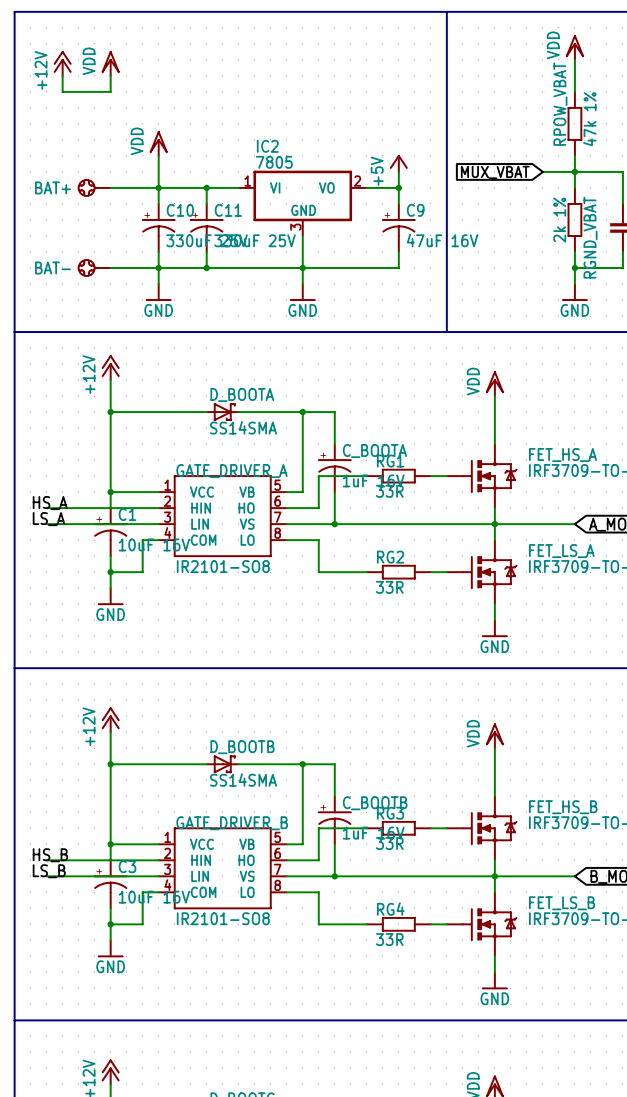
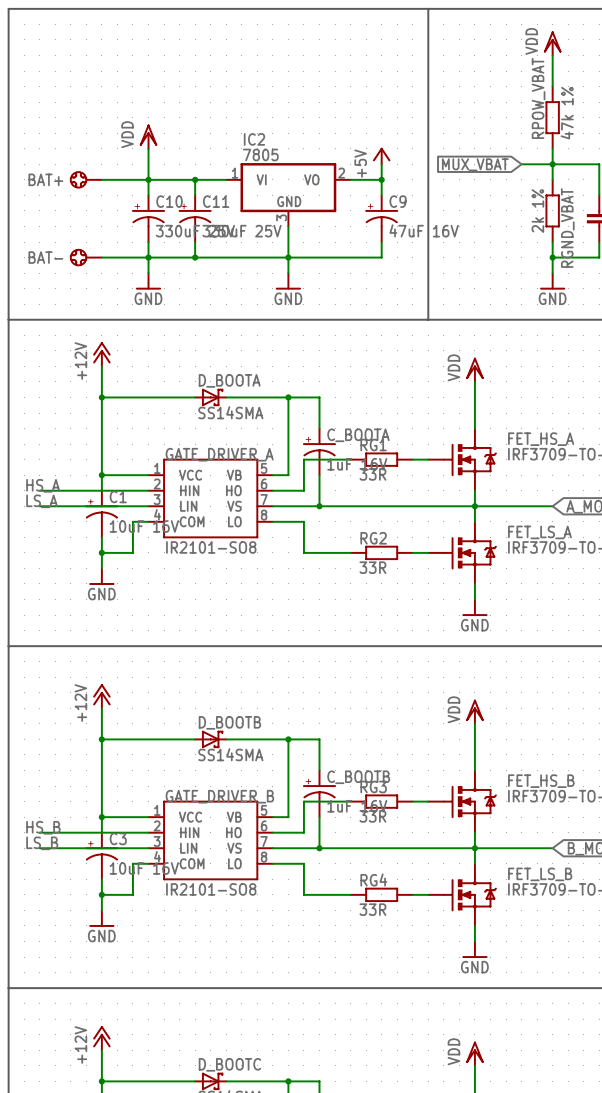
power symbol: +12V (62, 63) -> none
power symbol: VDD (110, 63) -> none
wire: (62, 75) (62, 91) (110, 91) (110, 75) -> none

